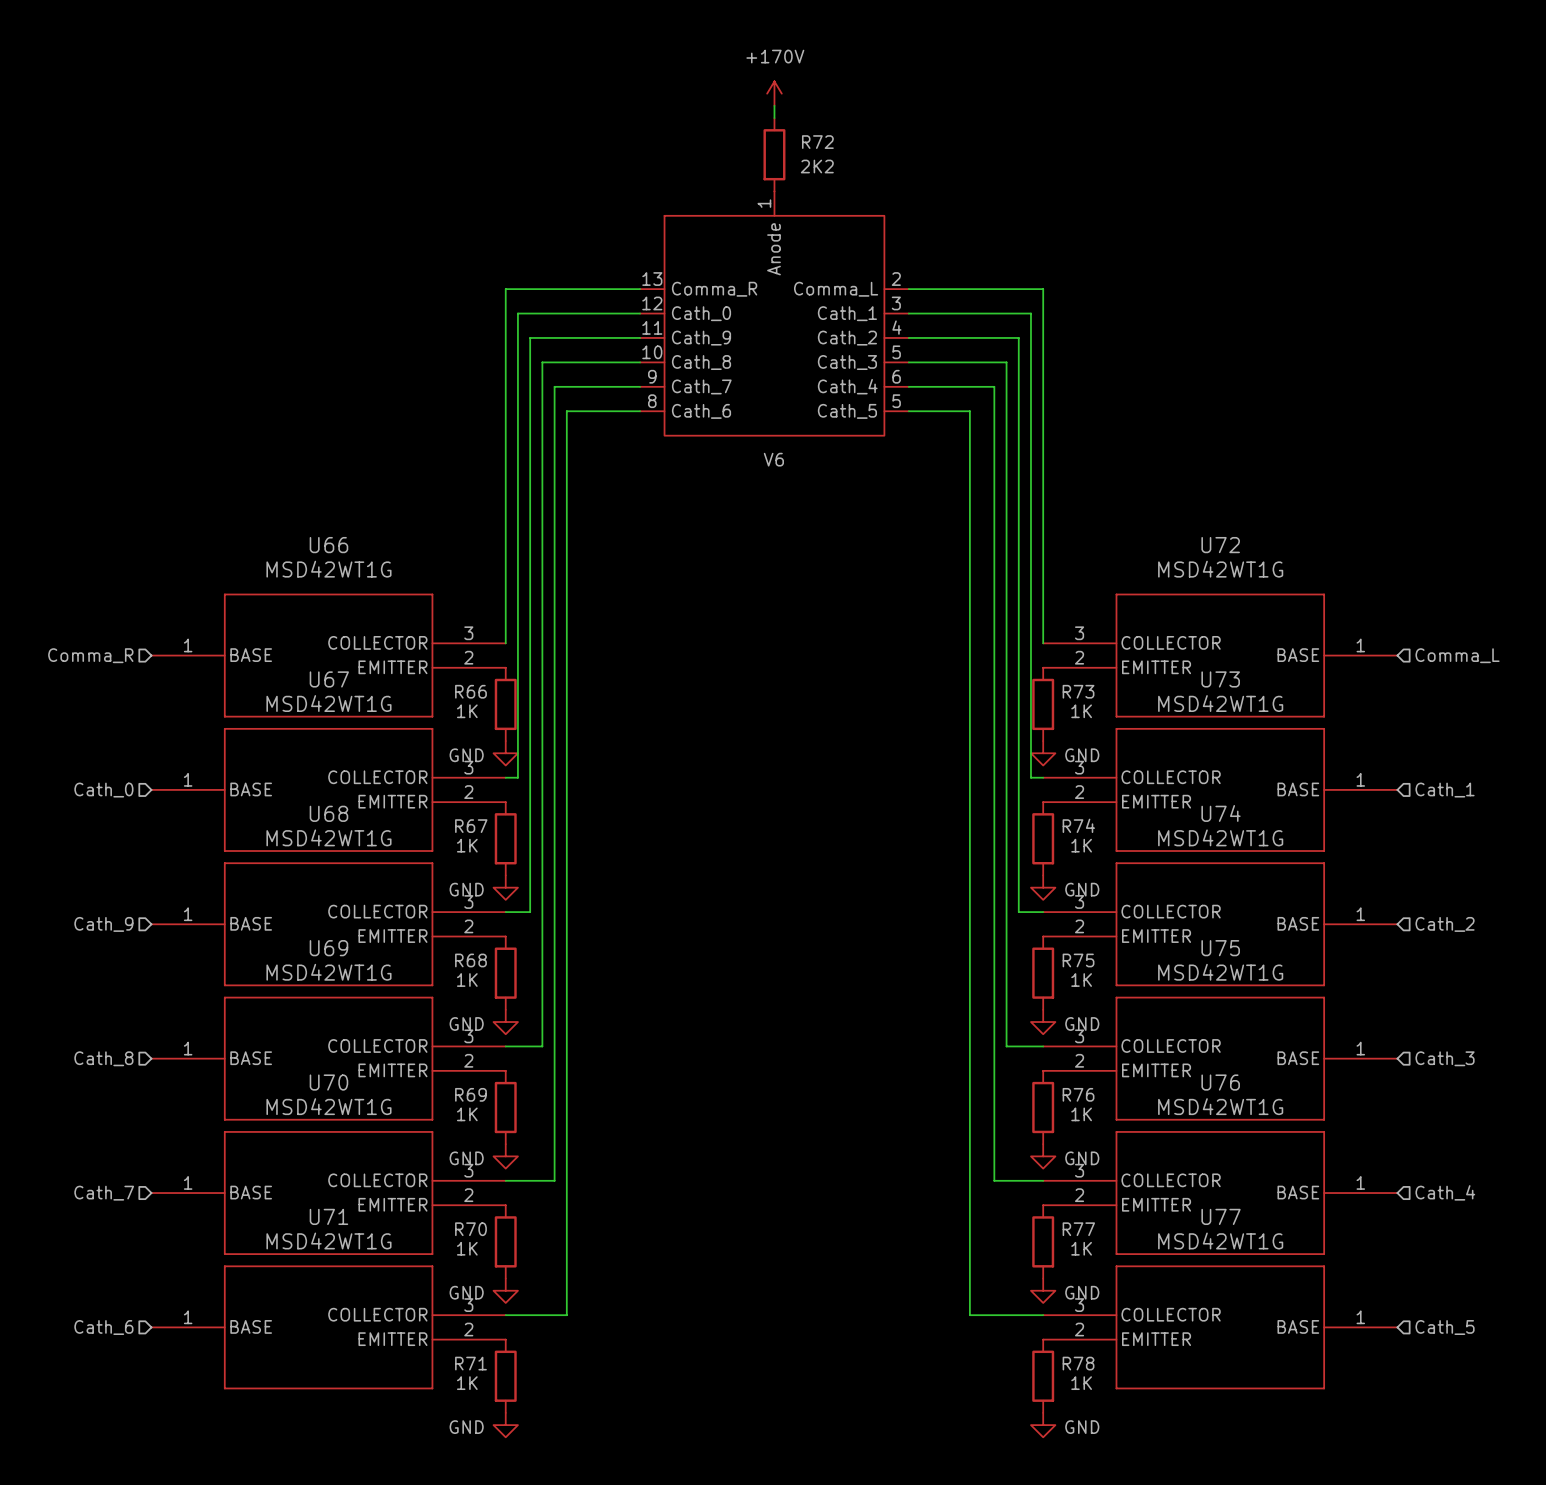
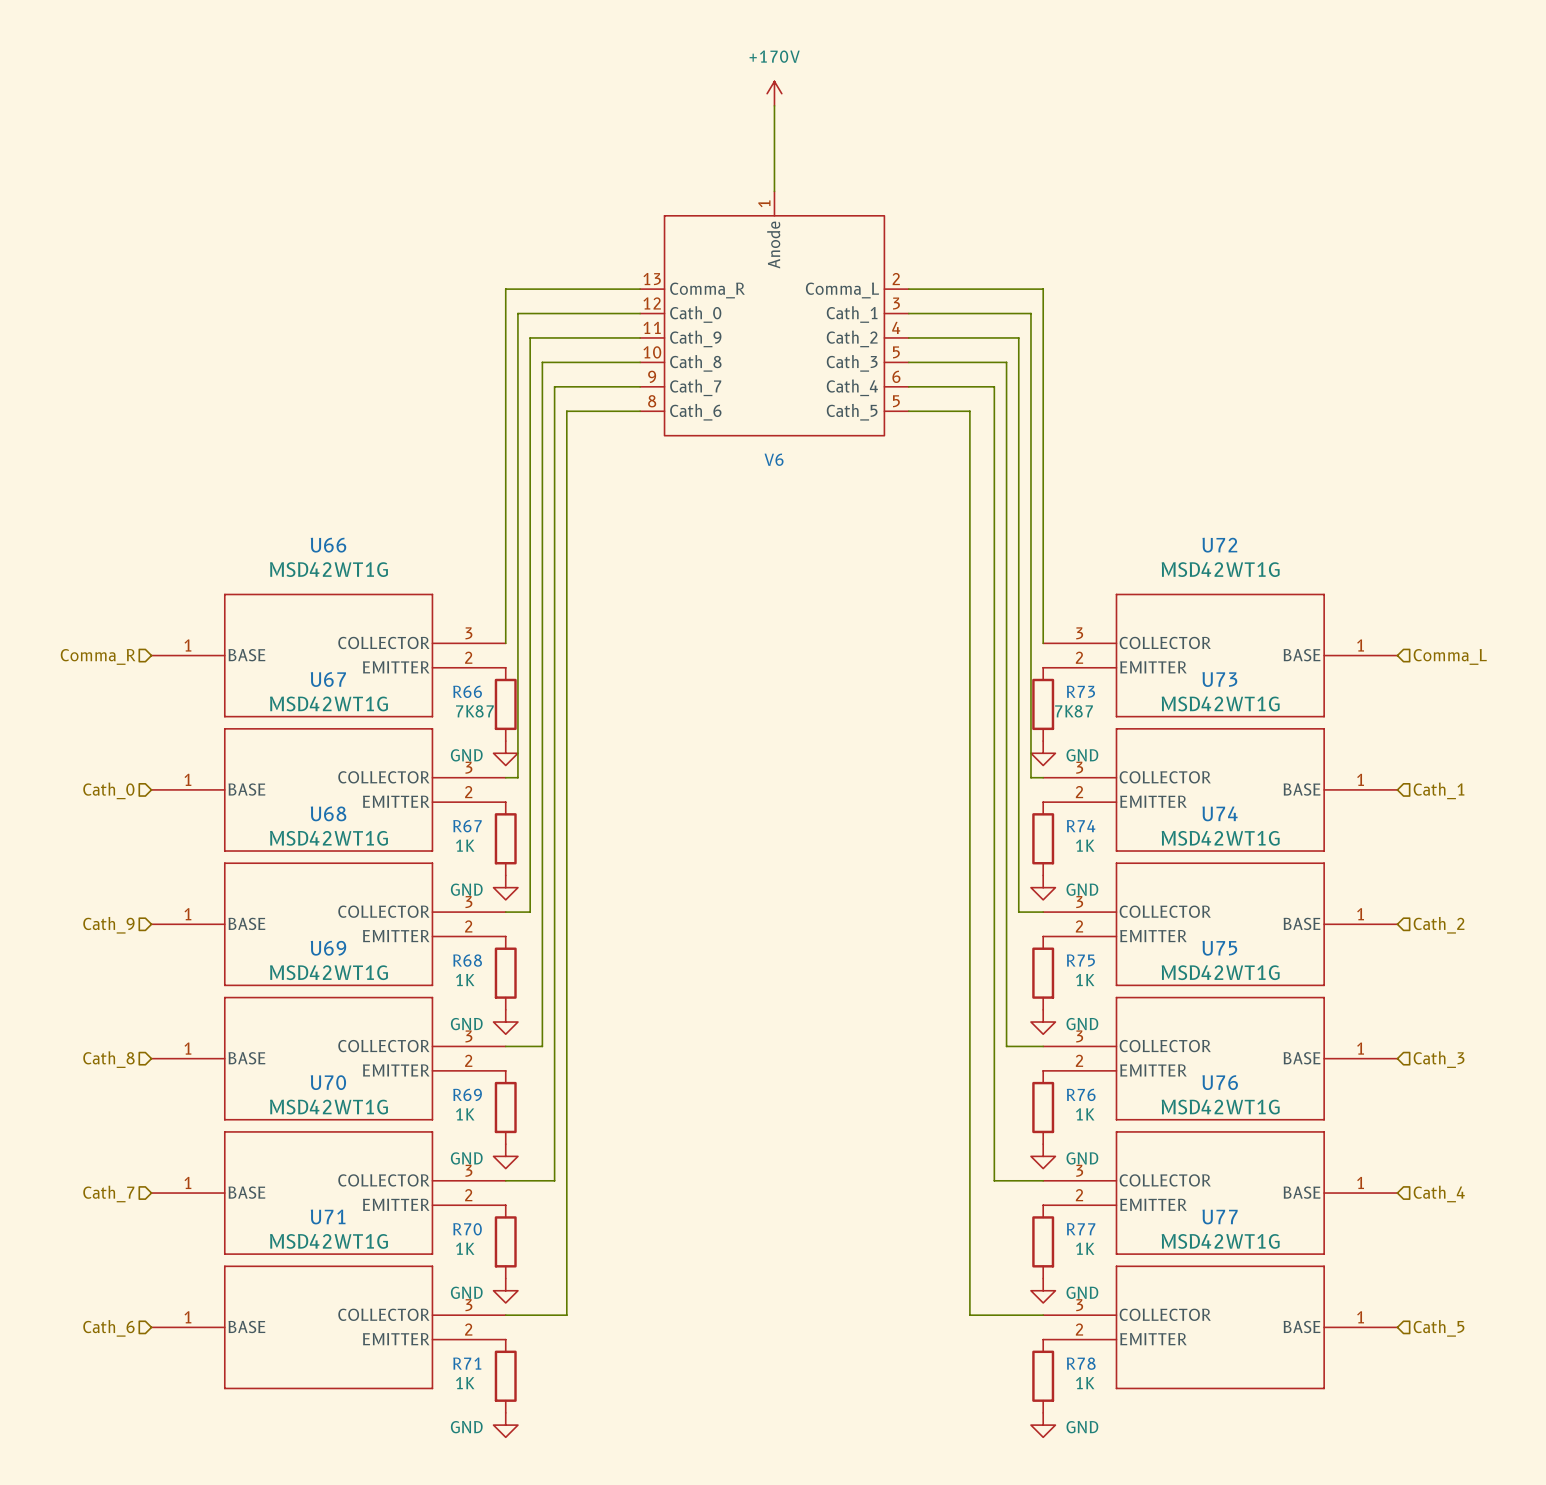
wire: none -> (774, 118) (774, 191)
R72: 2K2 (774, 154) -> none
R66 value: 1K (467, 711) -> 7K87 (474, 711)
R73 value: 1K (1081, 711) -> 7K87 (1074, 711)

